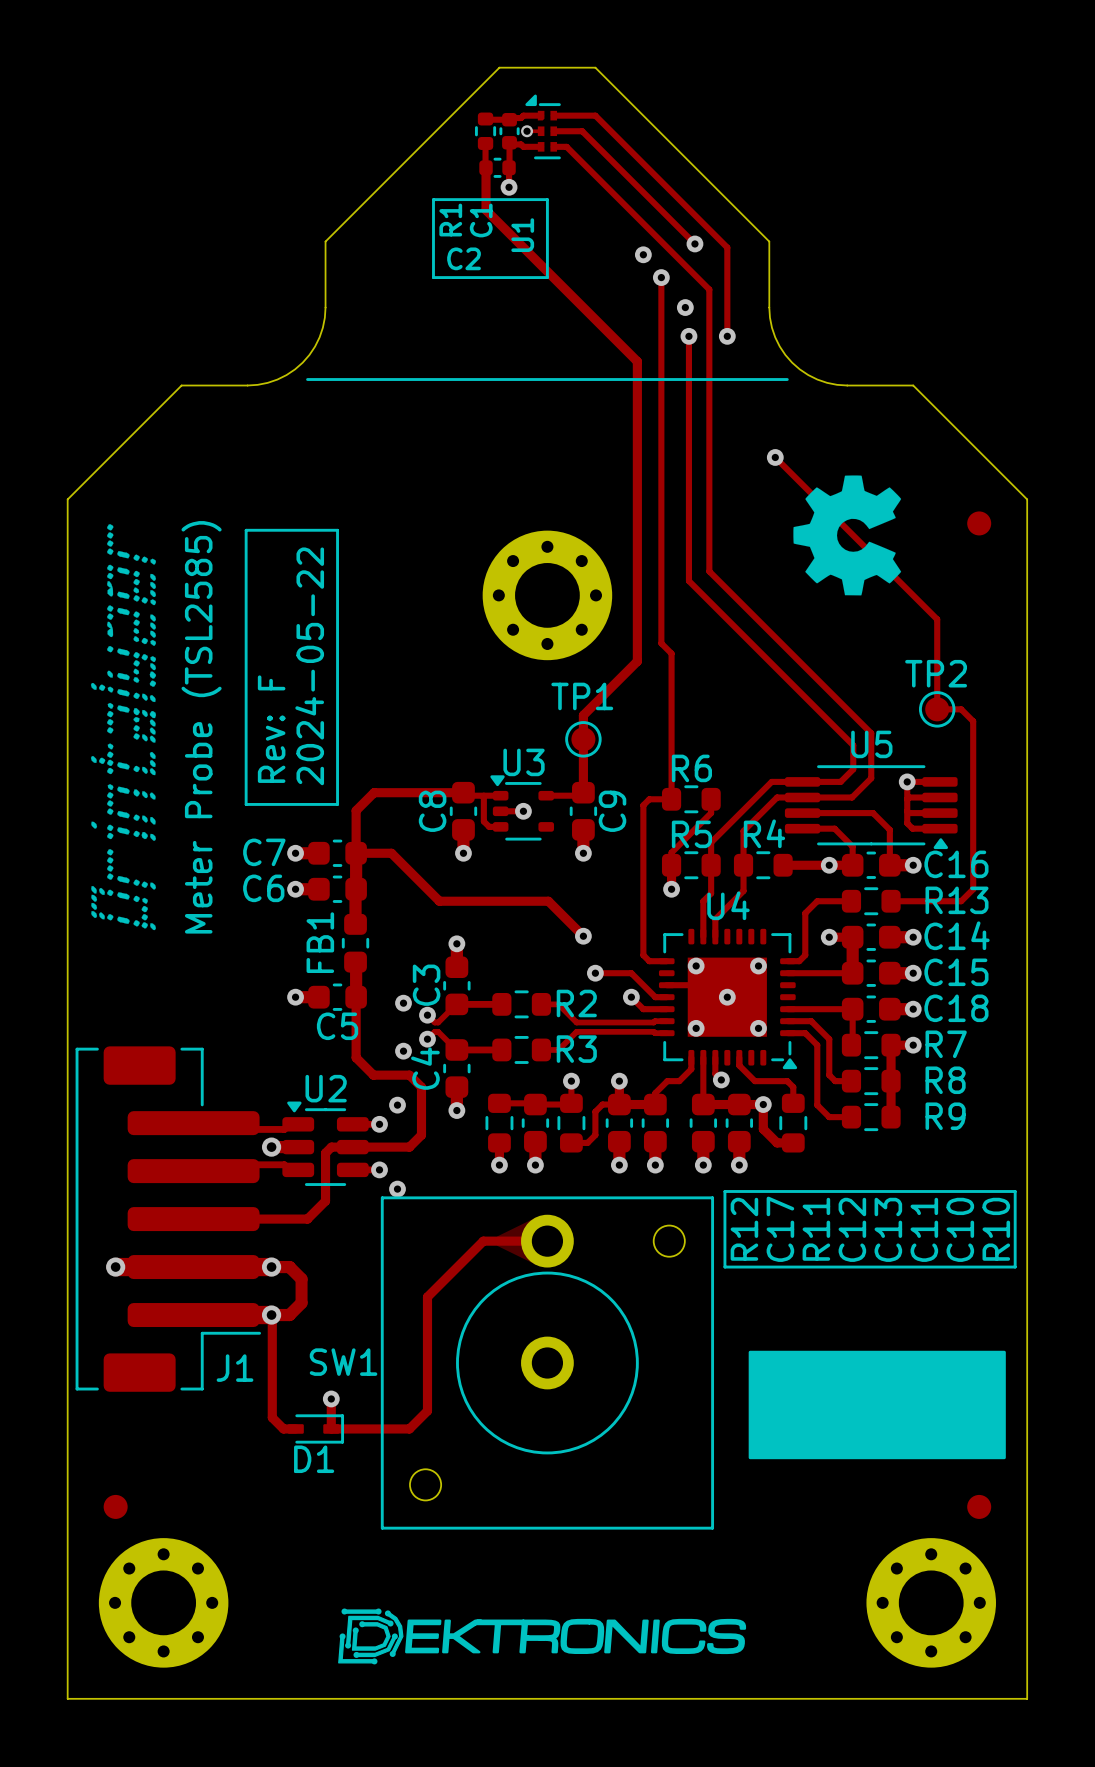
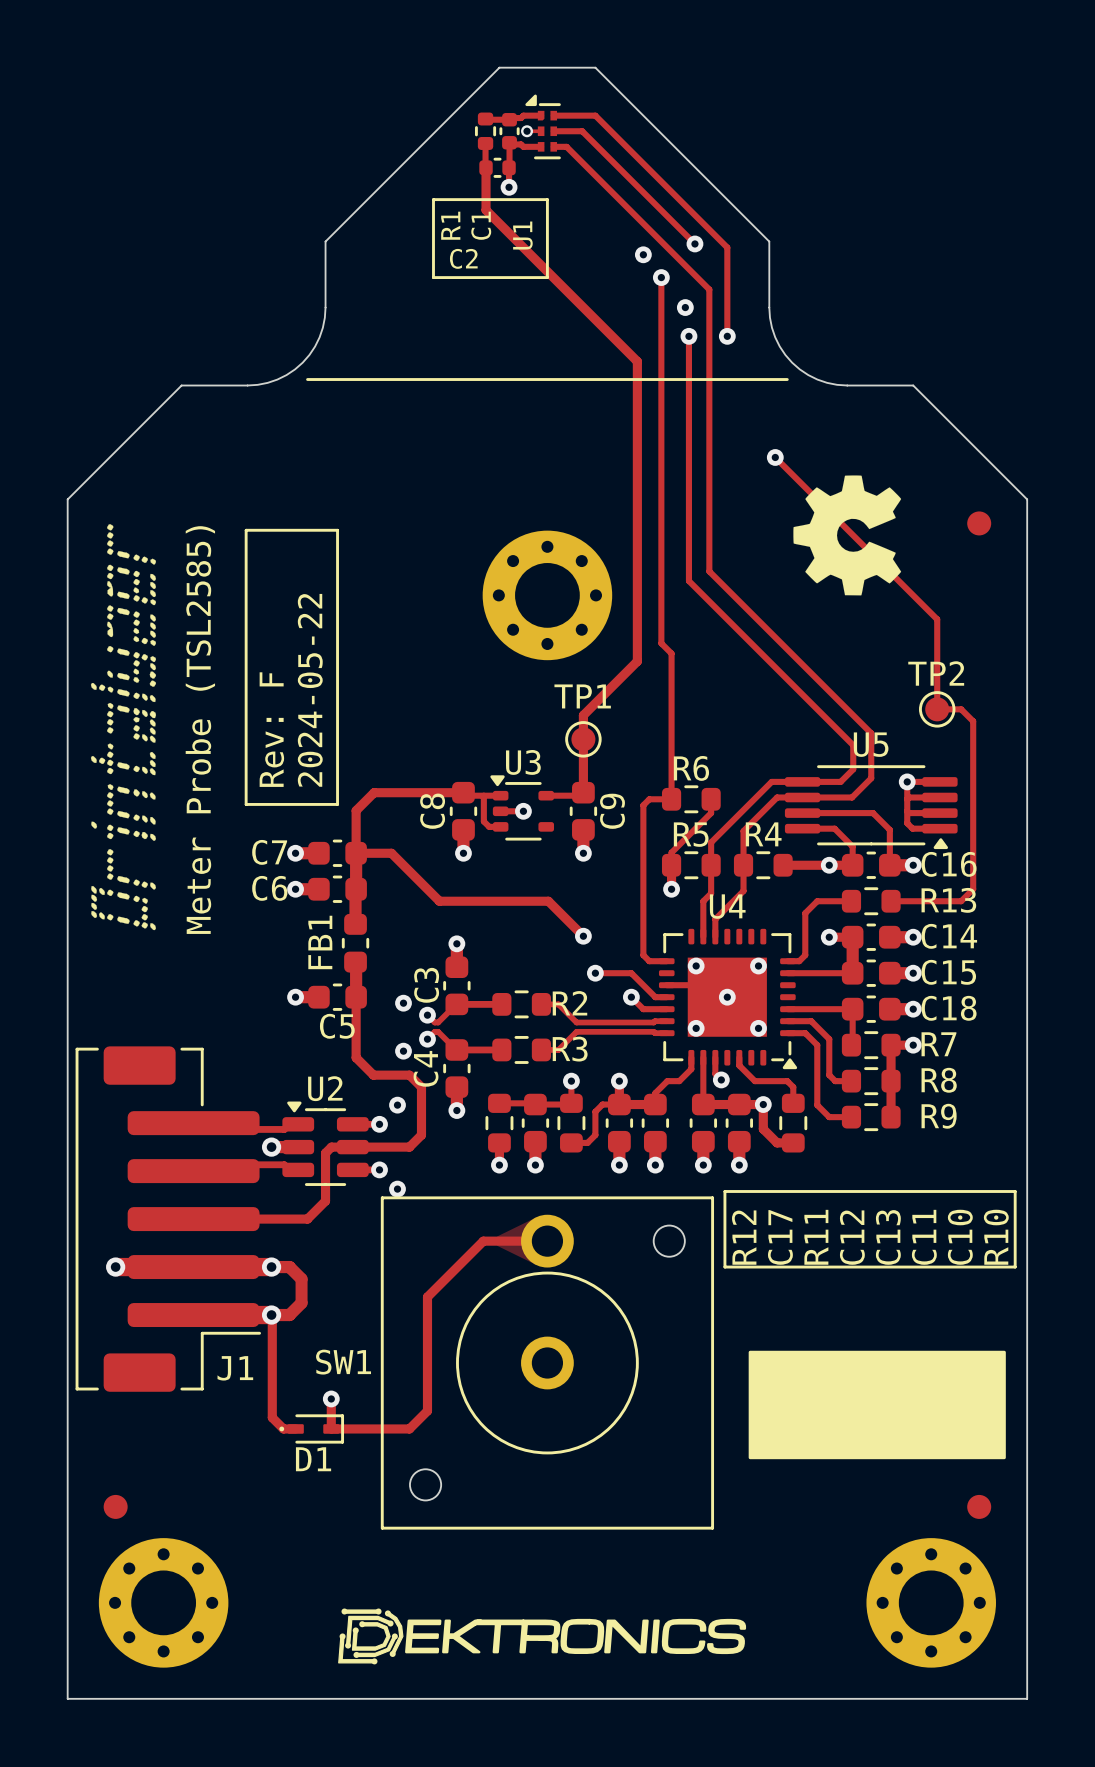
D1 footprint: [287, 1414, 345, 1444] -> [279, 1414, 345, 1444]

